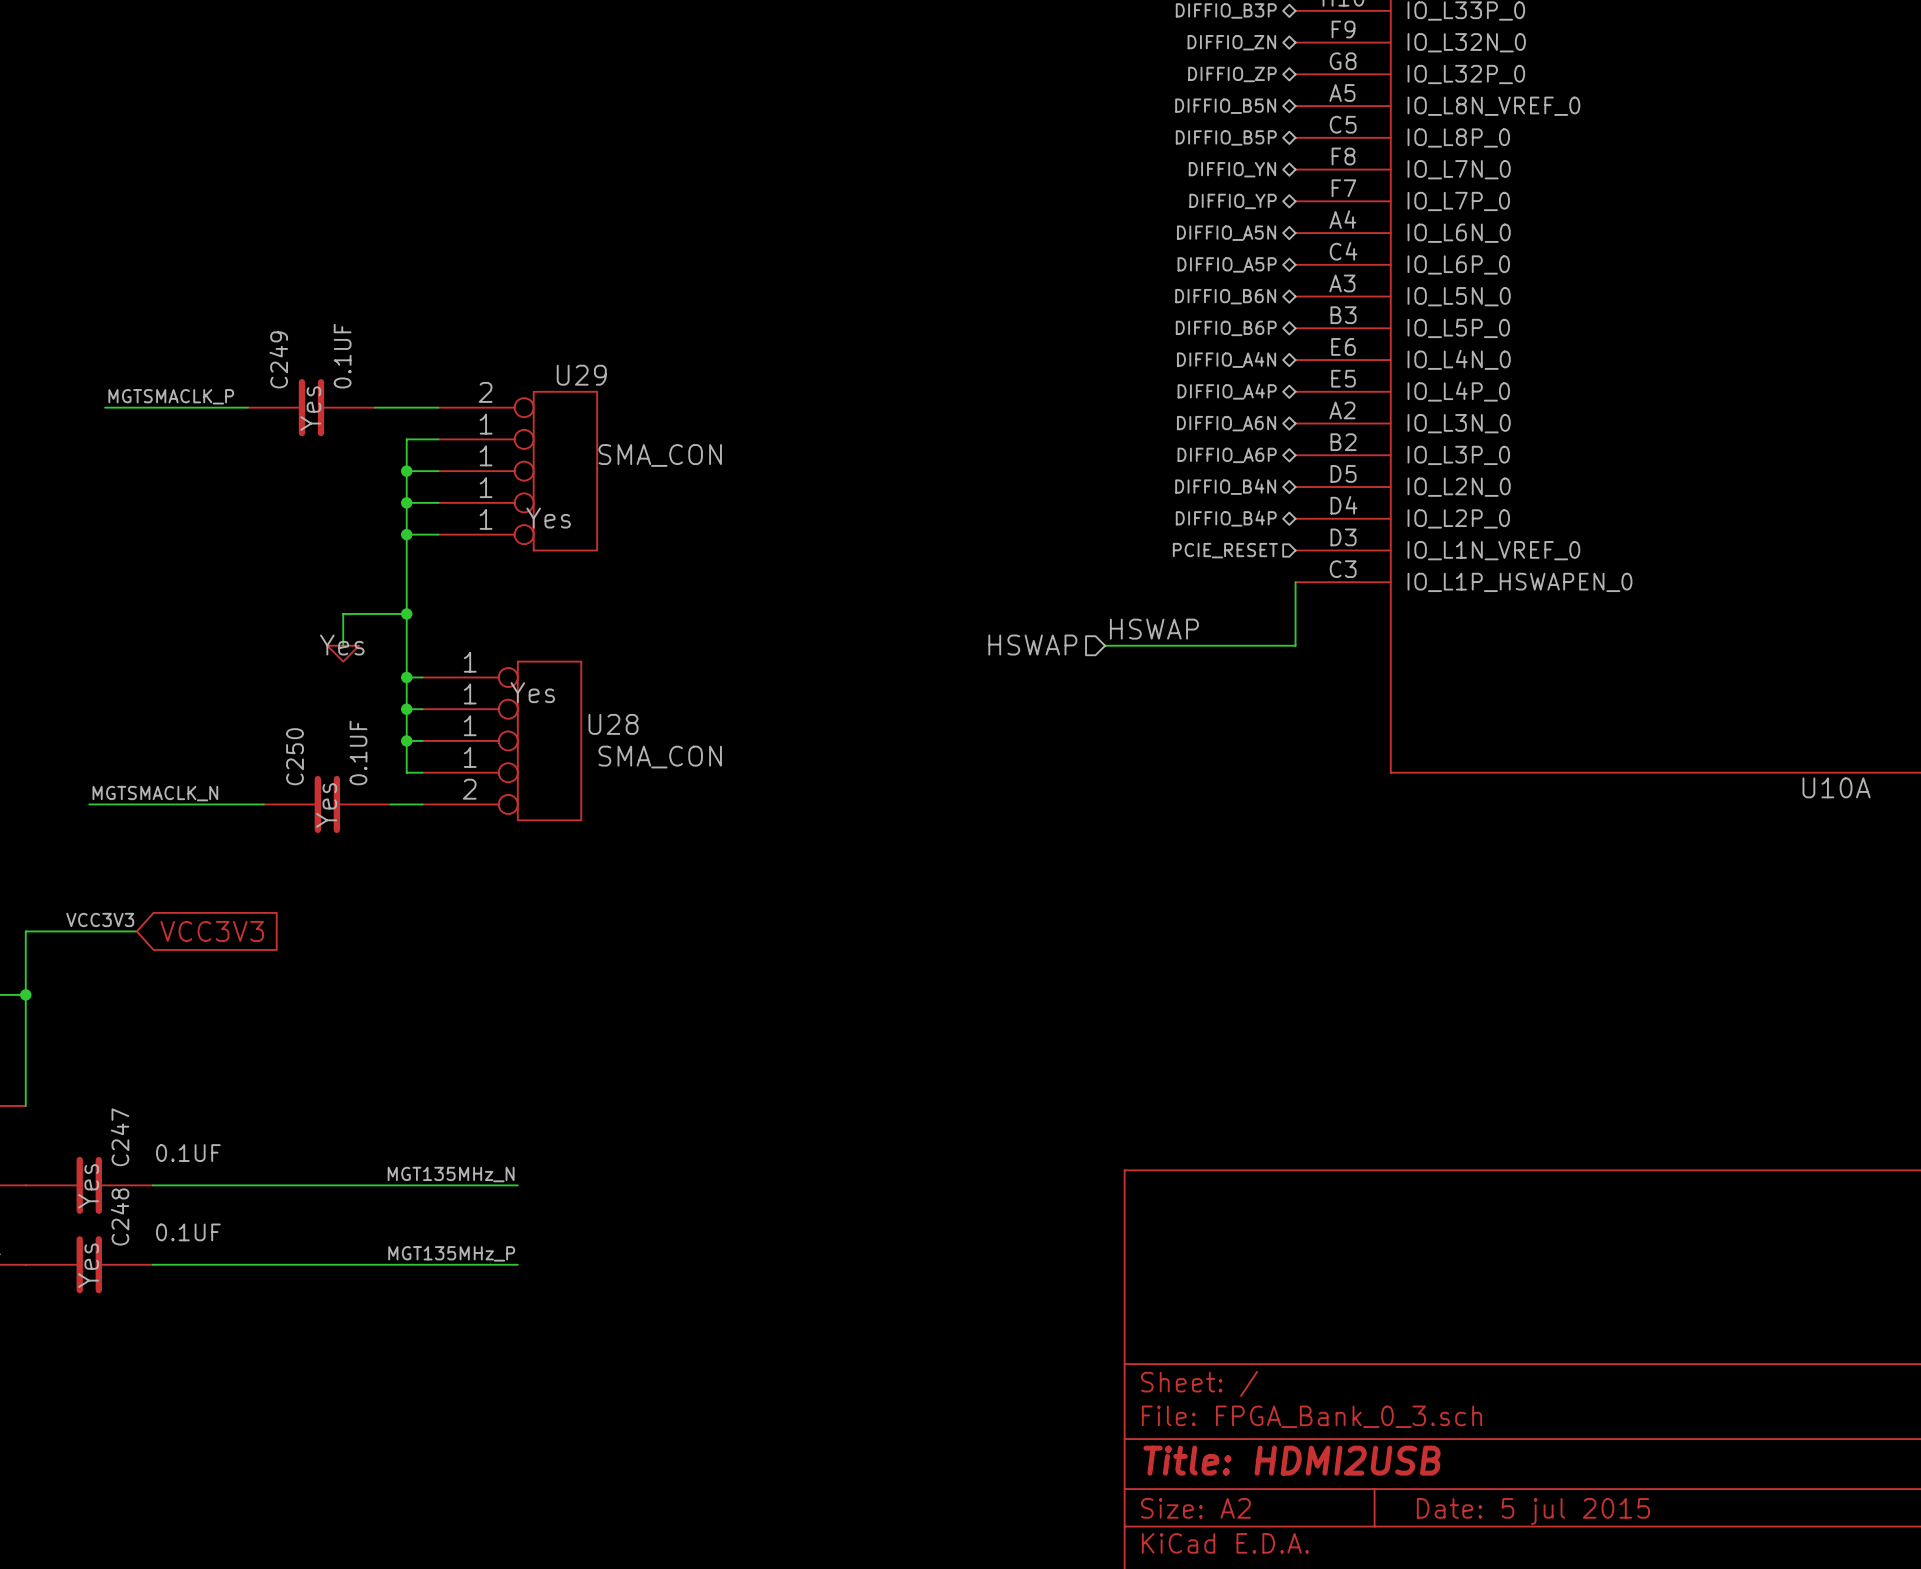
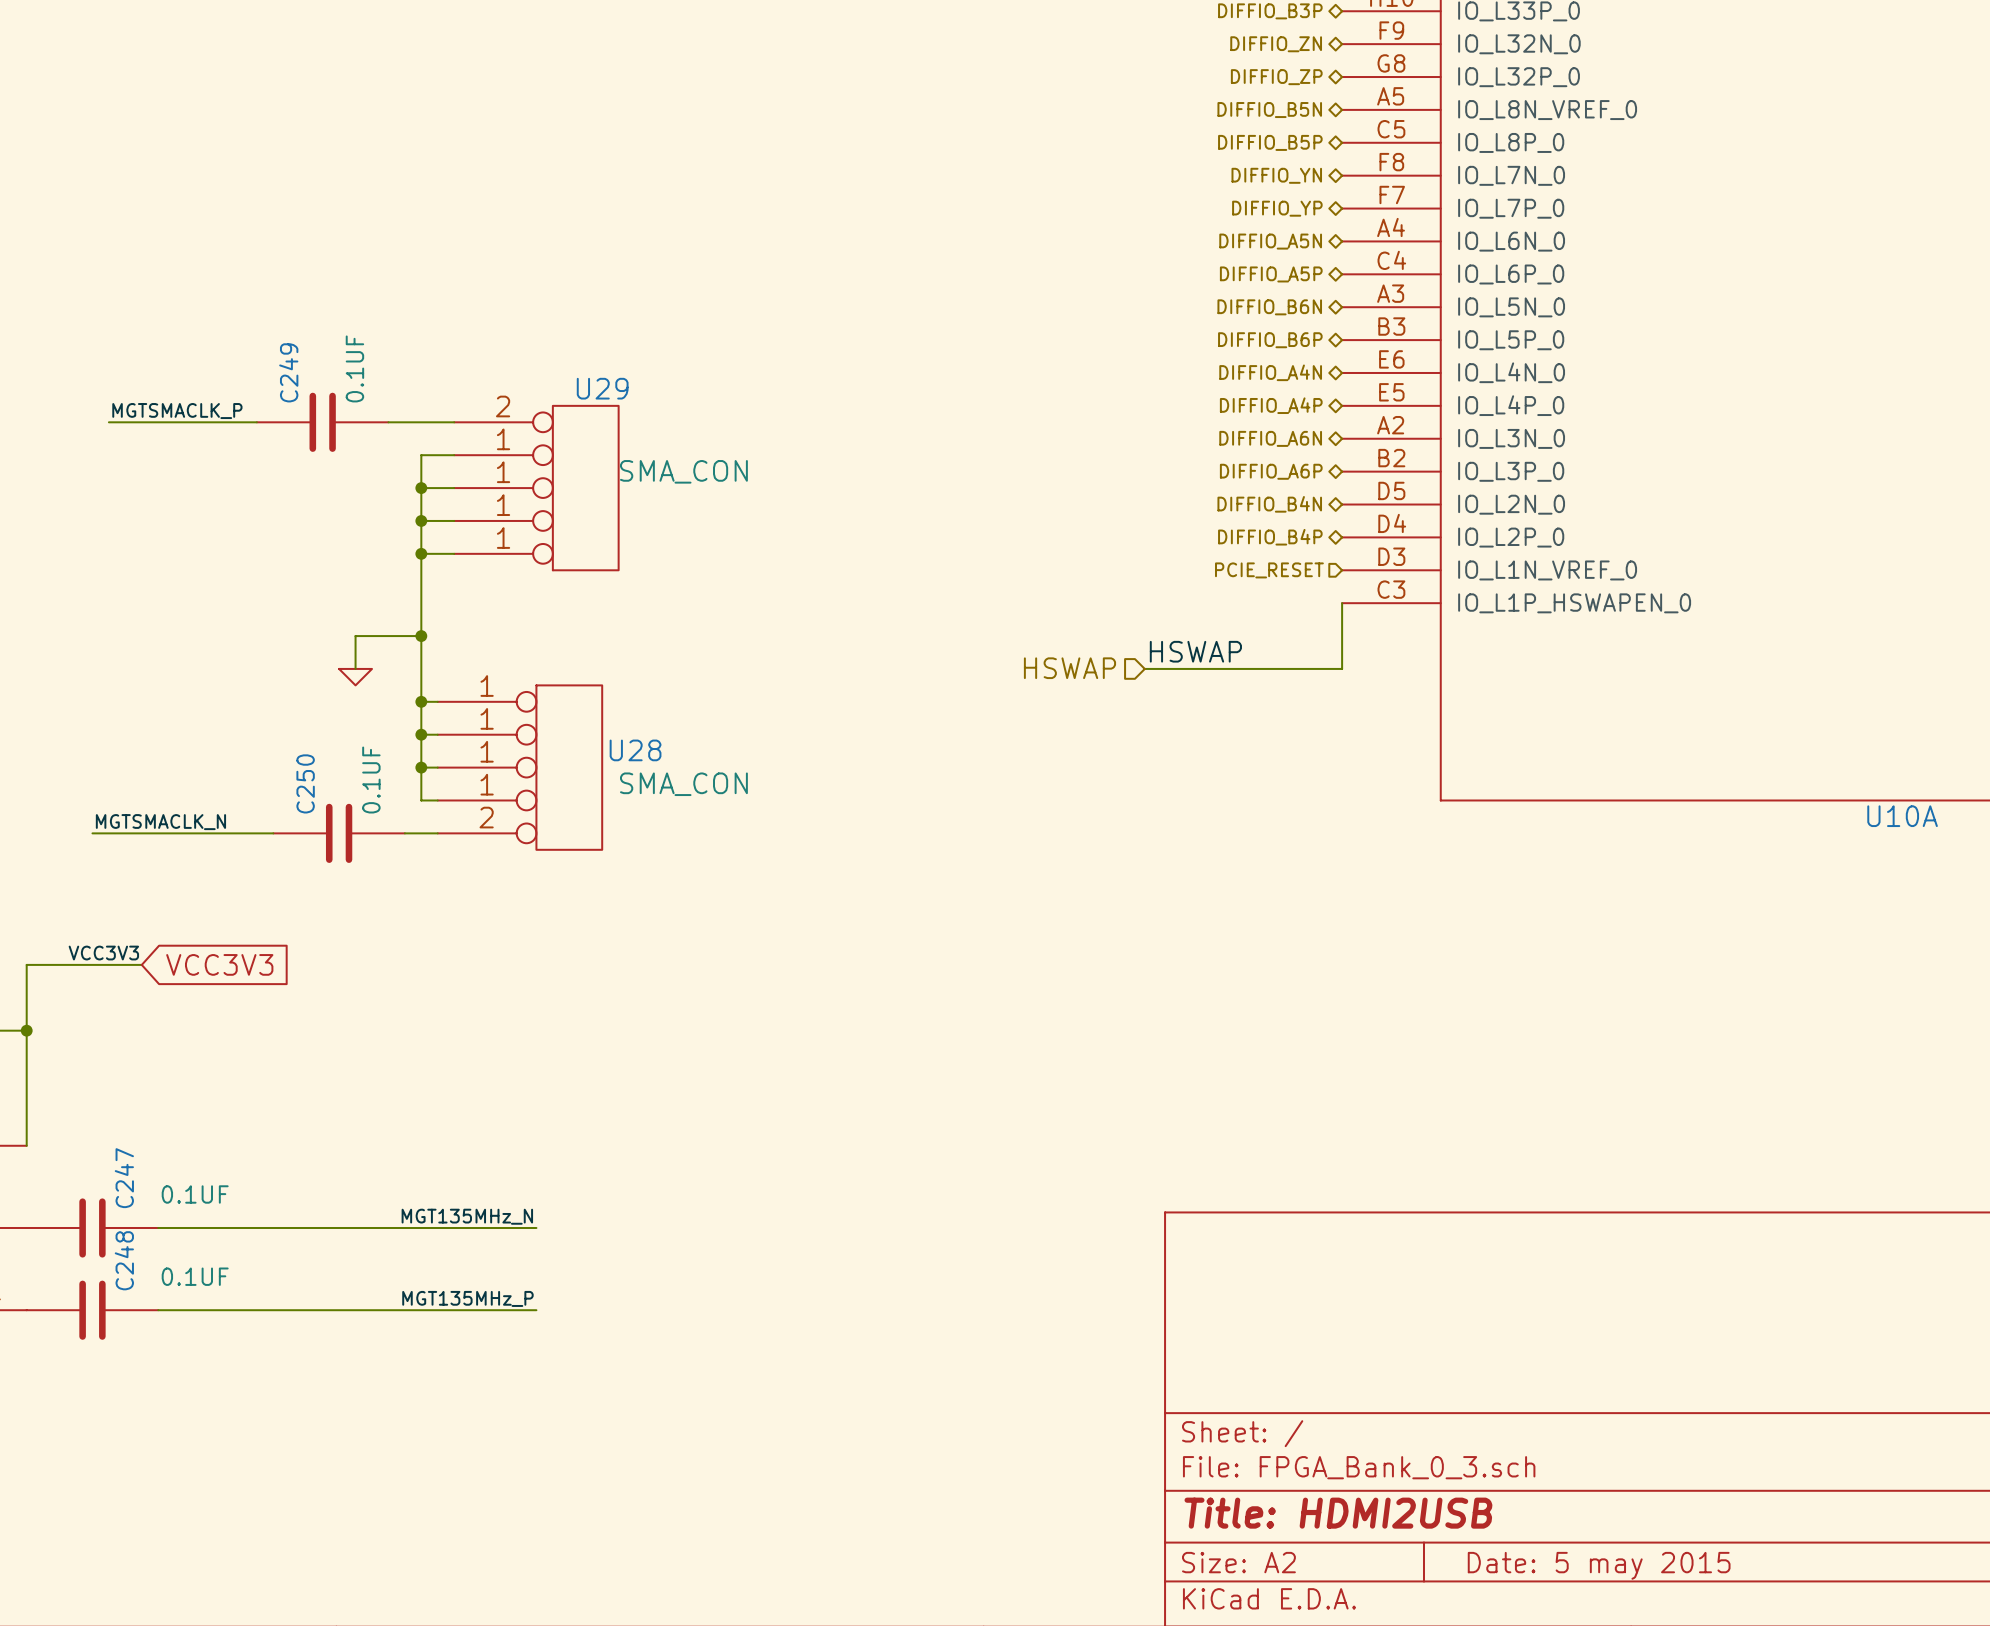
C249 text: Yes (310, 408) -> none
U29 text: Yes (548, 518) -> none
power symbol text: Yes (342, 645) -> none
U28 text: Yes (532, 692) -> none
C250 text: Yes (326, 805) -> none
C247 text: Yes (88, 1186) -> none
C248 text: Yes (88, 1265) -> none
title block: Date: 5 jul 2015 (1533, 1511) -> Date: 5 may 2015 (1599, 1565)

